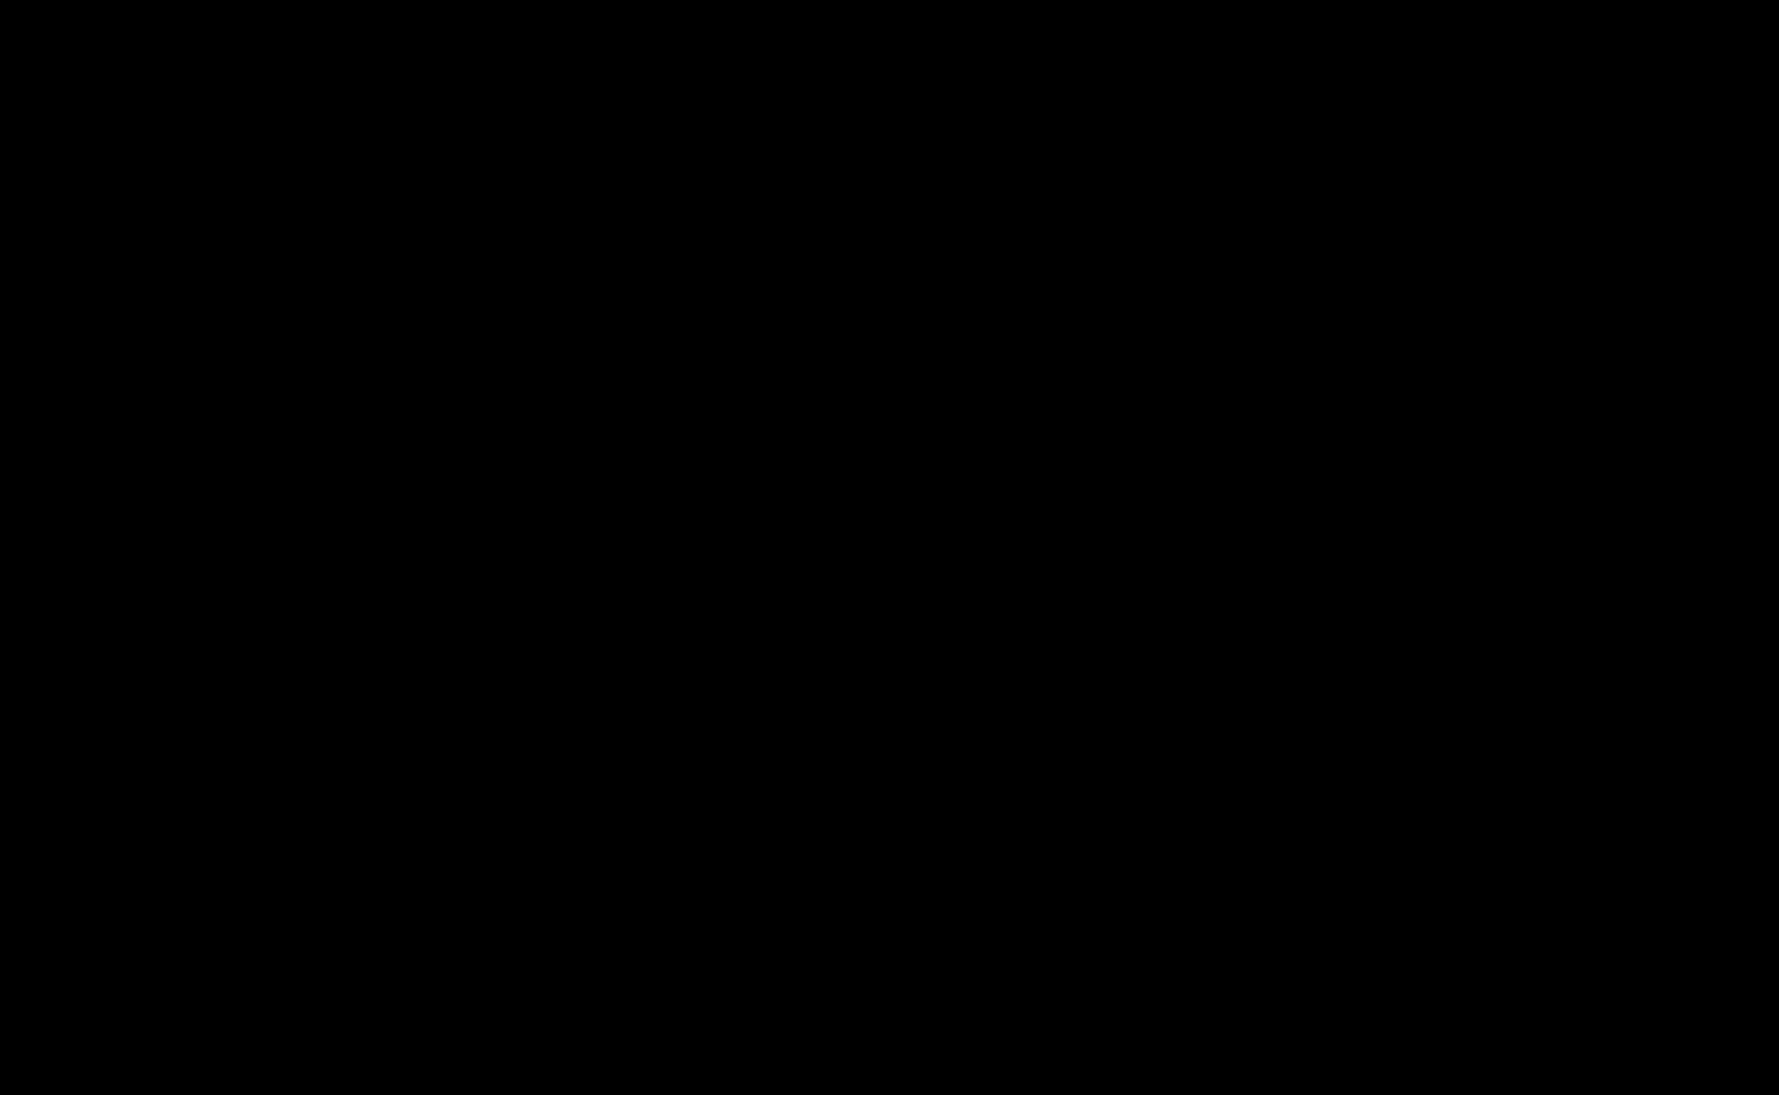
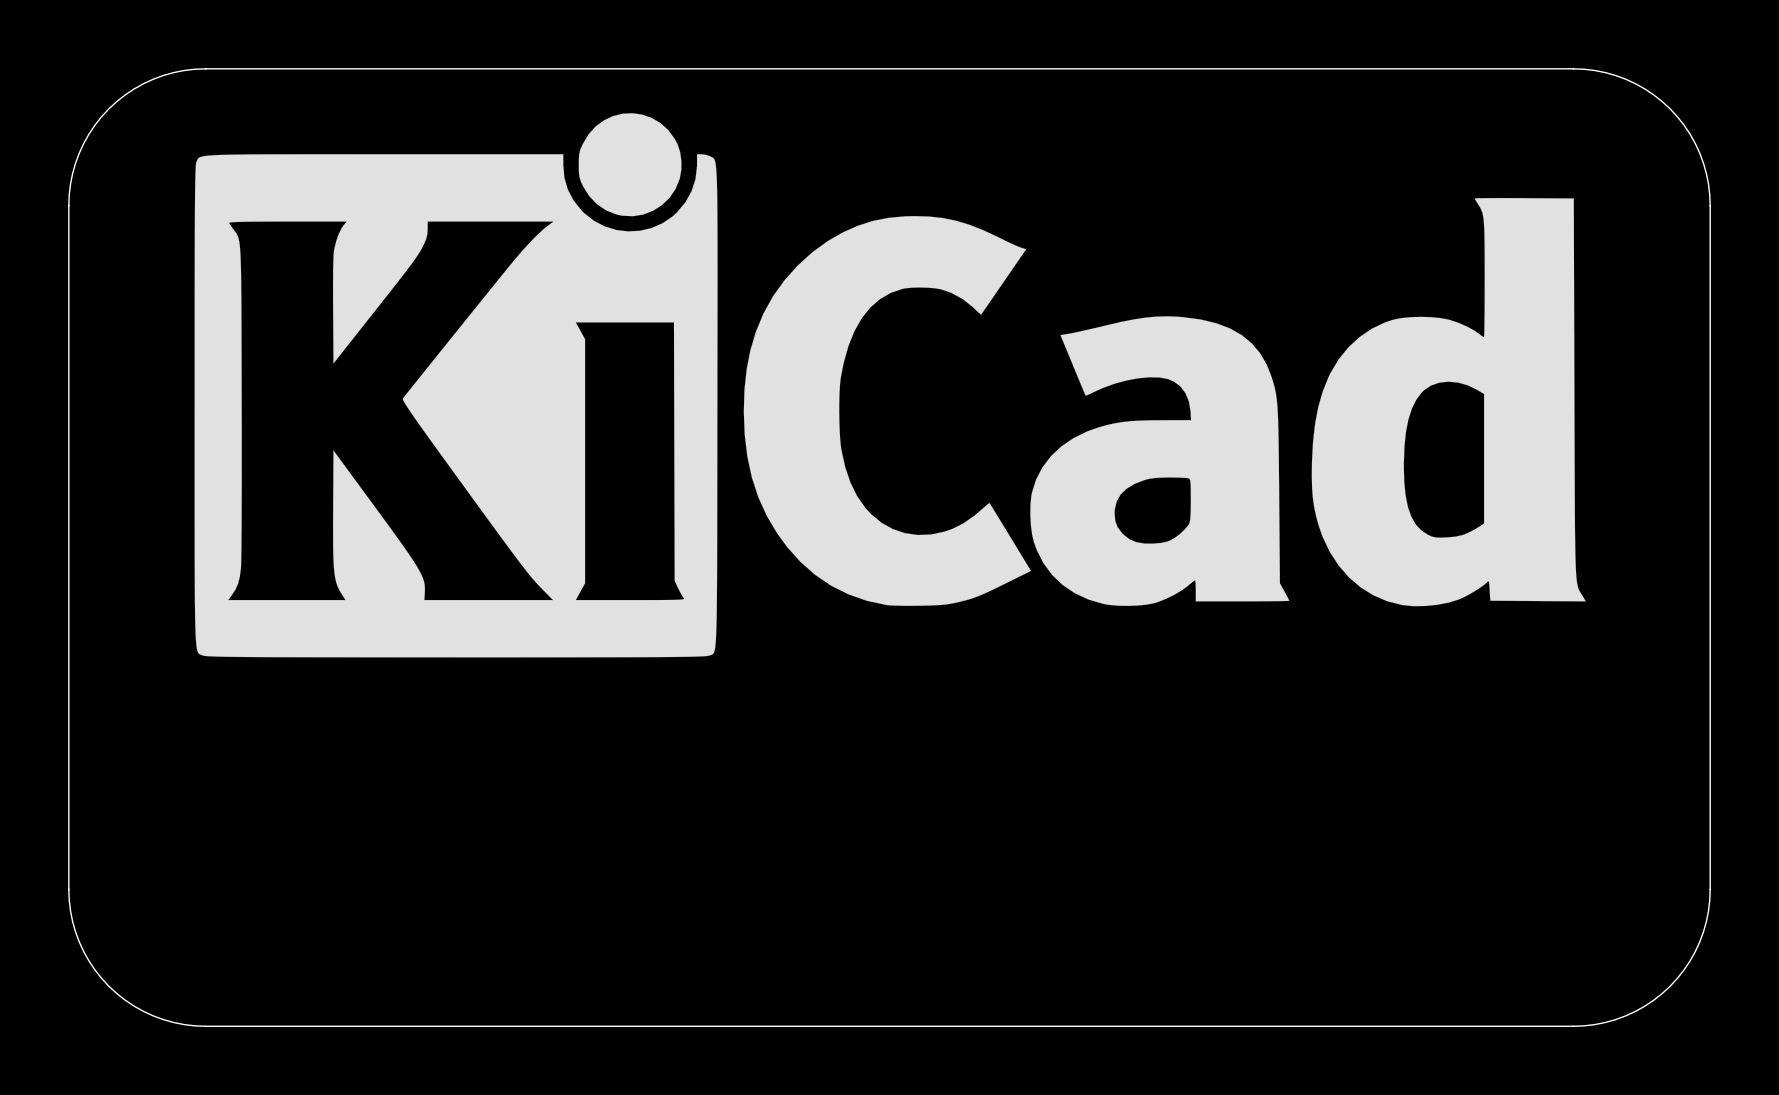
board edge: none -> (205, 68) (1573, 68) (1605, 72) (1625, 79) (1644, 88) (1670, 108) (1690, 134) (1703, 163) (1709, 194) (1710, 889) (1708, 910) (1703, 931) (1690, 960) (1670, 986) (1653, 1000) (1635, 1011) (1605, 1022) (1573, 1026) (205, 1026) (173, 1022) (153, 1015) (134, 1006) (108, 986) (88, 960) (75, 931) (69, 900) (69, 194) (75, 163) (83, 143) (101, 116) (116, 101) (143, 83) (163, 75) (184, 70) (205, 68)
drawing: none -> [194, 113, 1586, 658]

